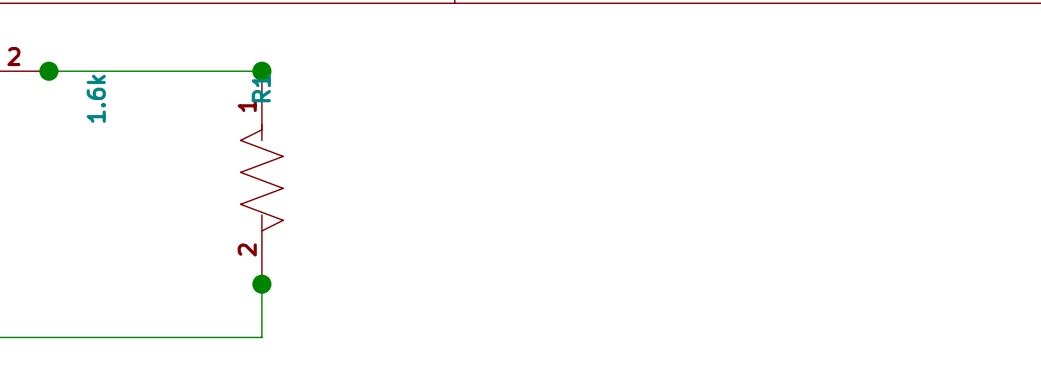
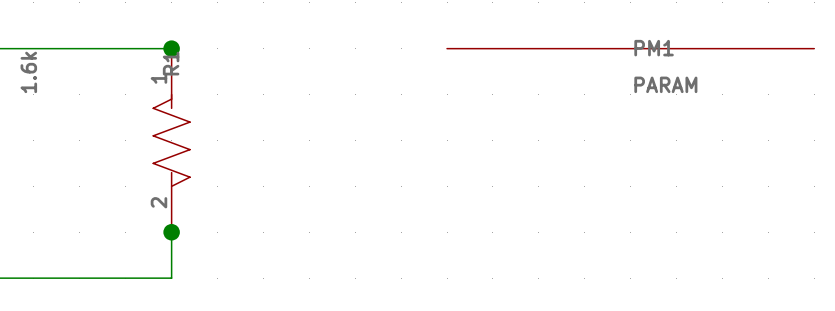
PM1: none -> PARAM (630, 48)

